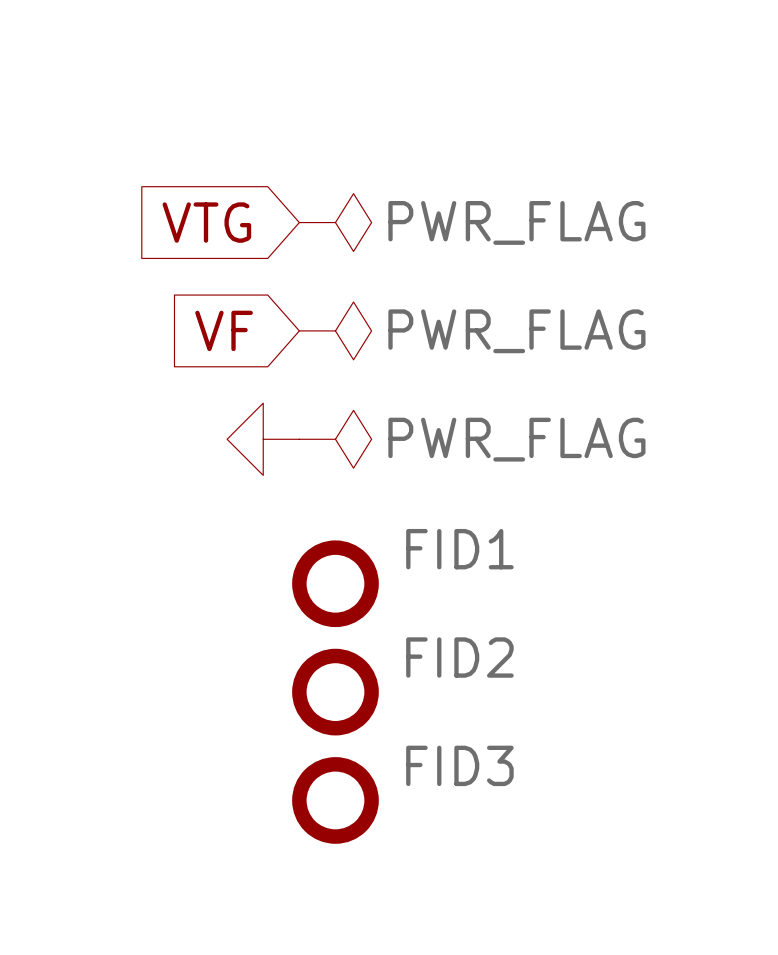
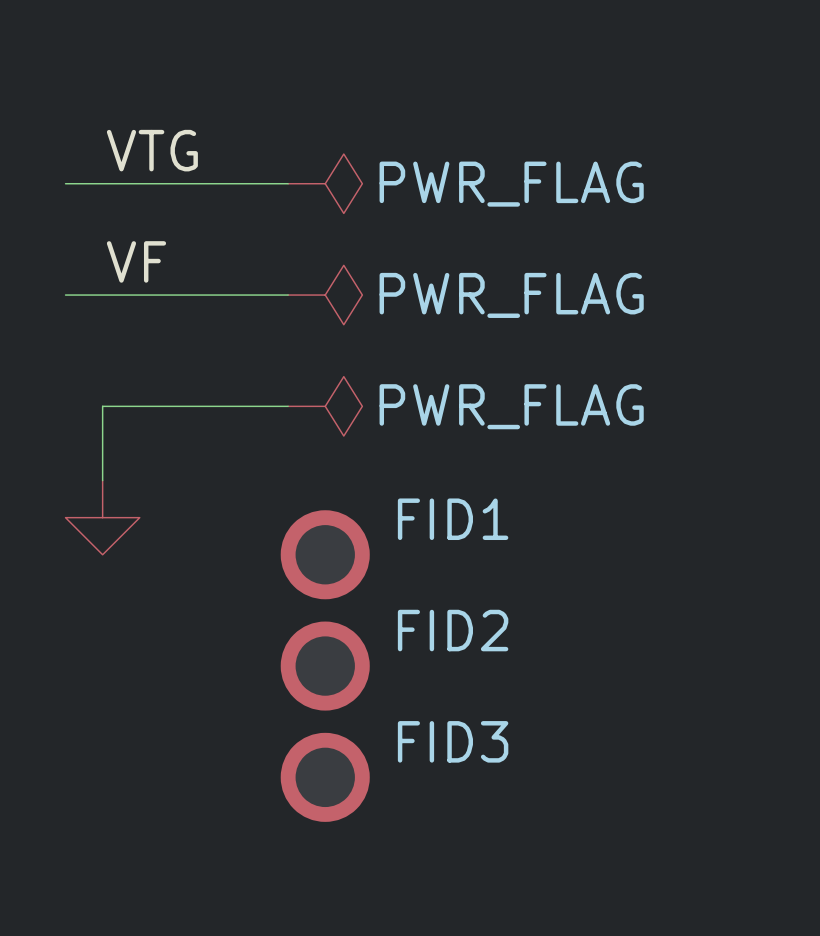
label: none -> VTG (152, 150)
wire: none -> (65, 183) (288, 183)
global label: VTG (206, 222) -> none
label: none -> VF (136, 261)
wire: none -> (65, 295) (288, 295)
global label: VF (224, 330) -> none
power symbol rotation: 0° (263, 439) -> 90° counterclockwise (102, 517)
power symbol position: (263, 439) -> (102, 517)
wire: none -> (288, 406) (102, 406) (102, 480)

